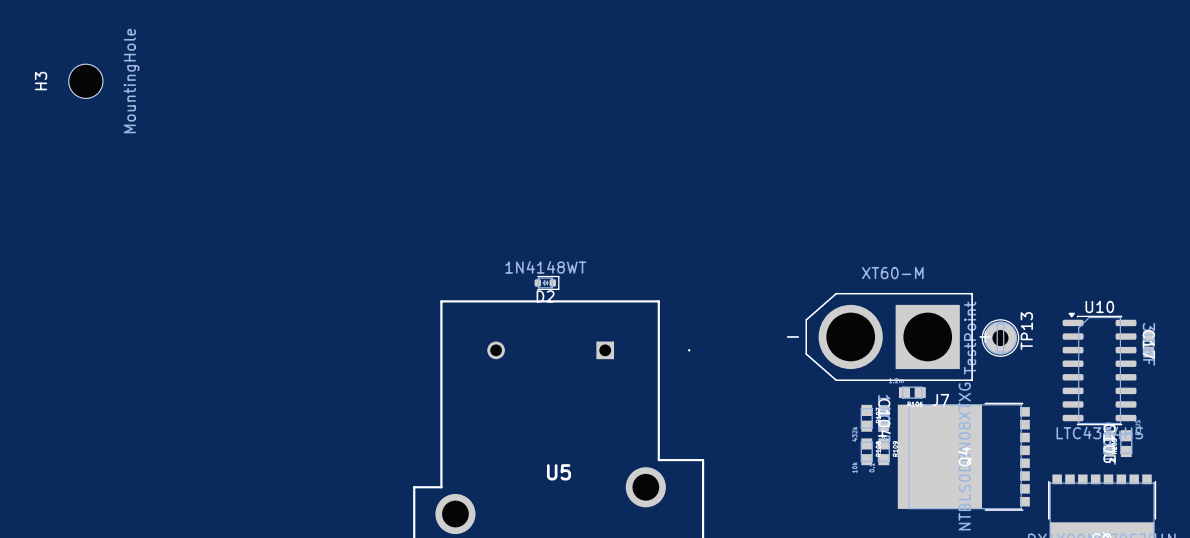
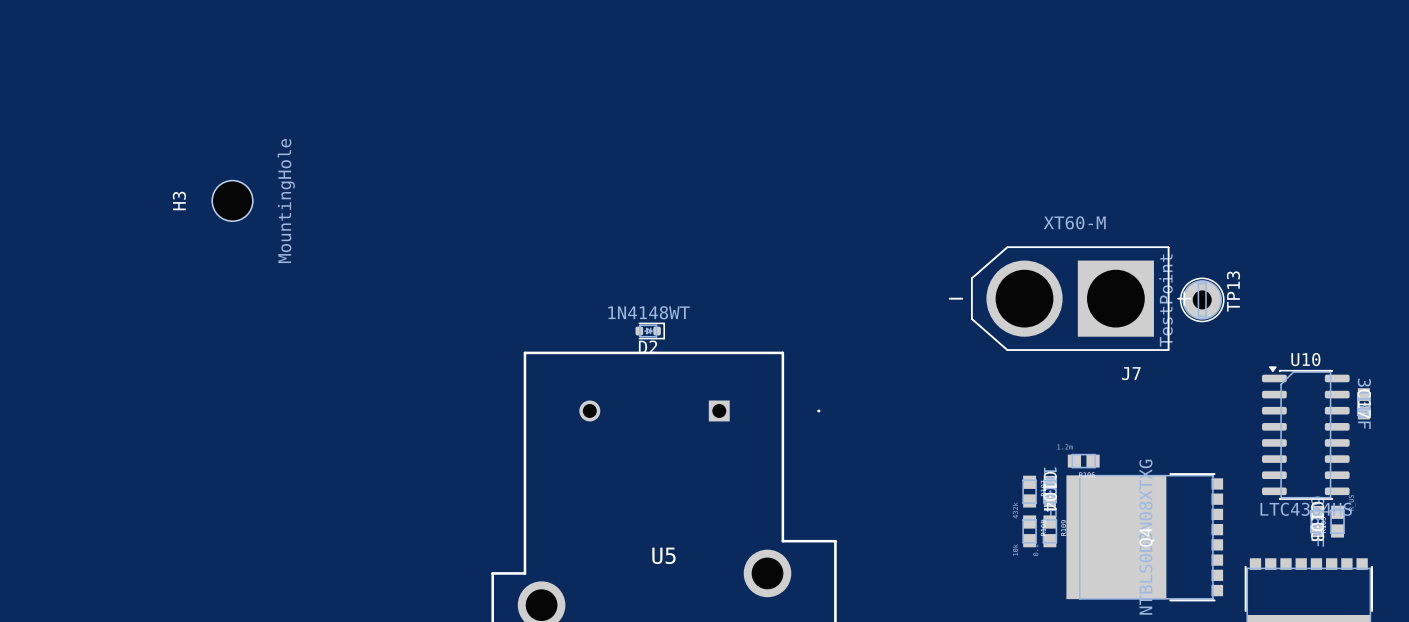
H3 position: (85, 81) -> (232, 200)
J7 position: (889, 336) -> (1070, 298)
TP13 position: (1000, 338) -> (1202, 299)

